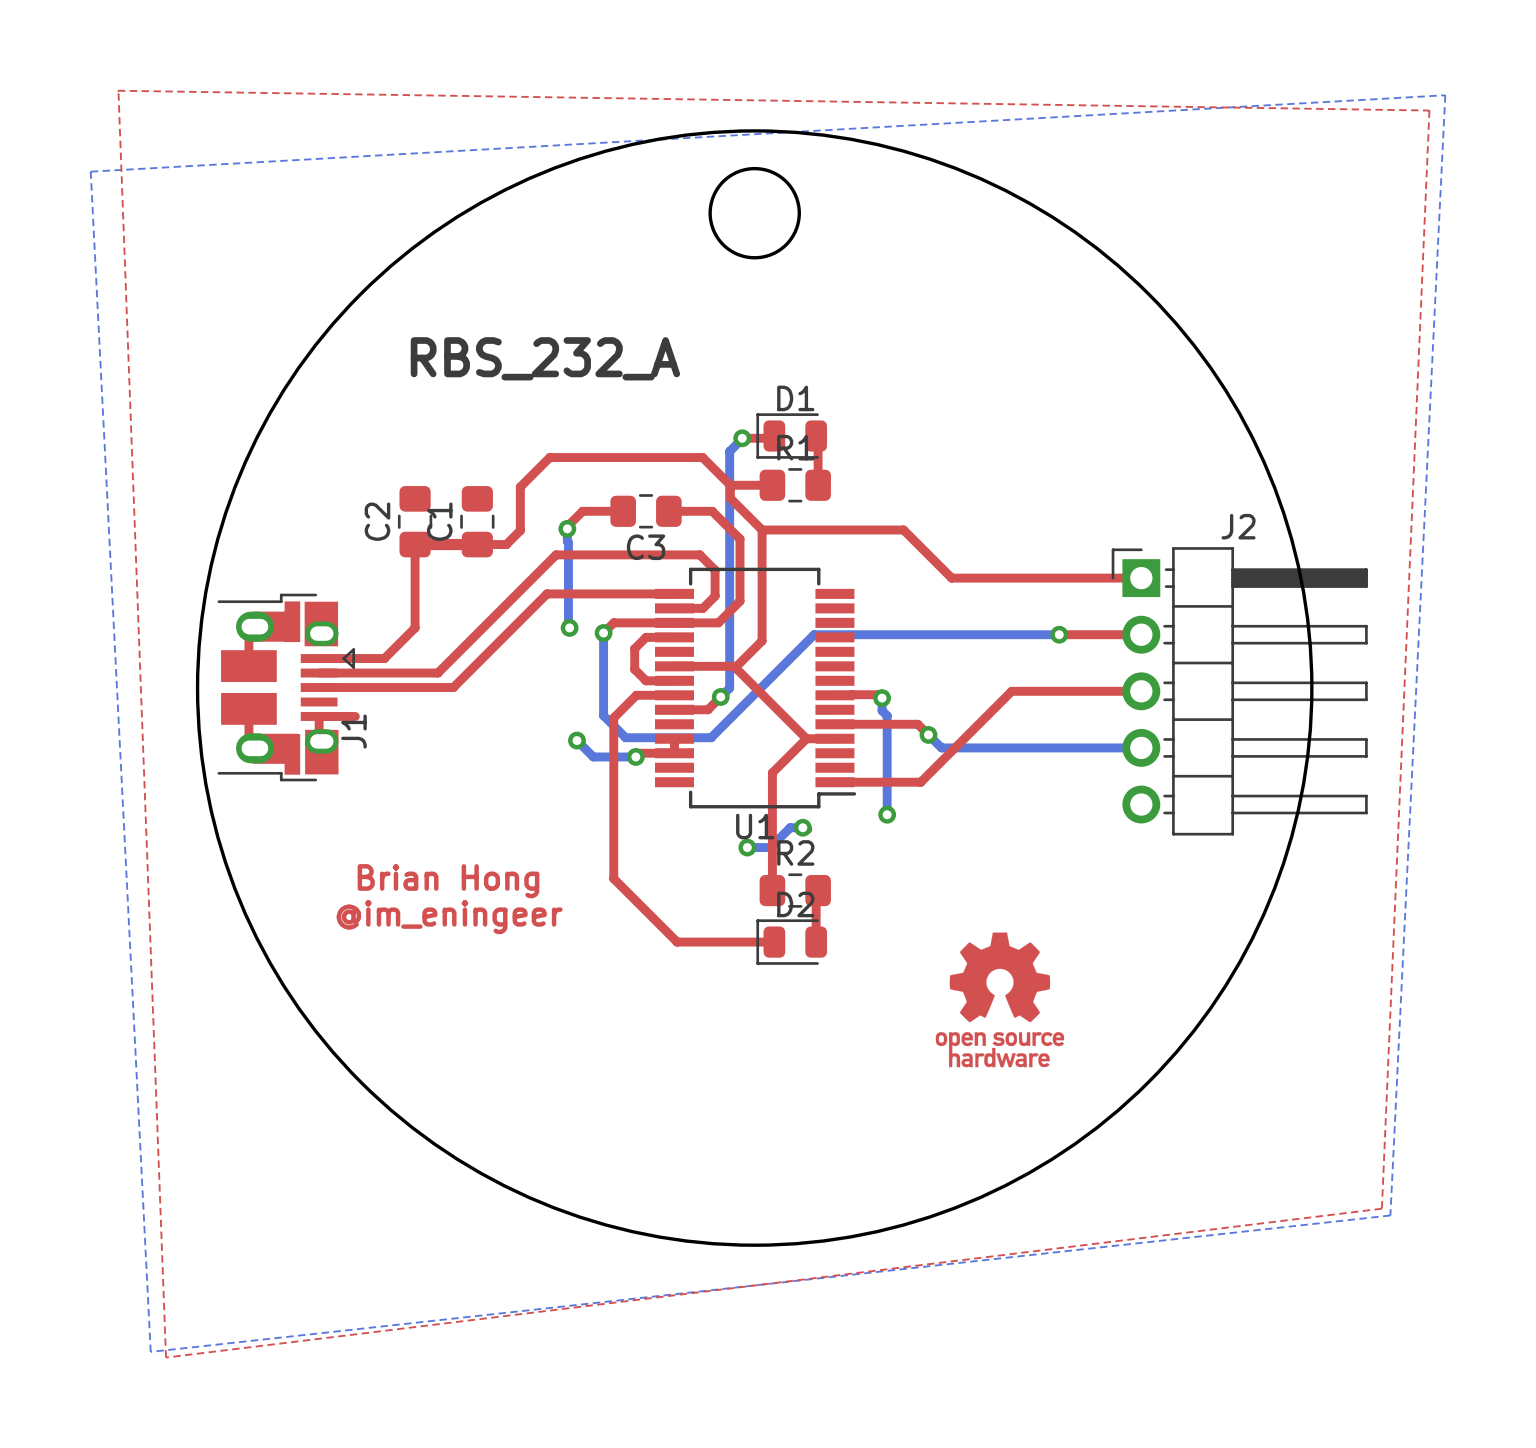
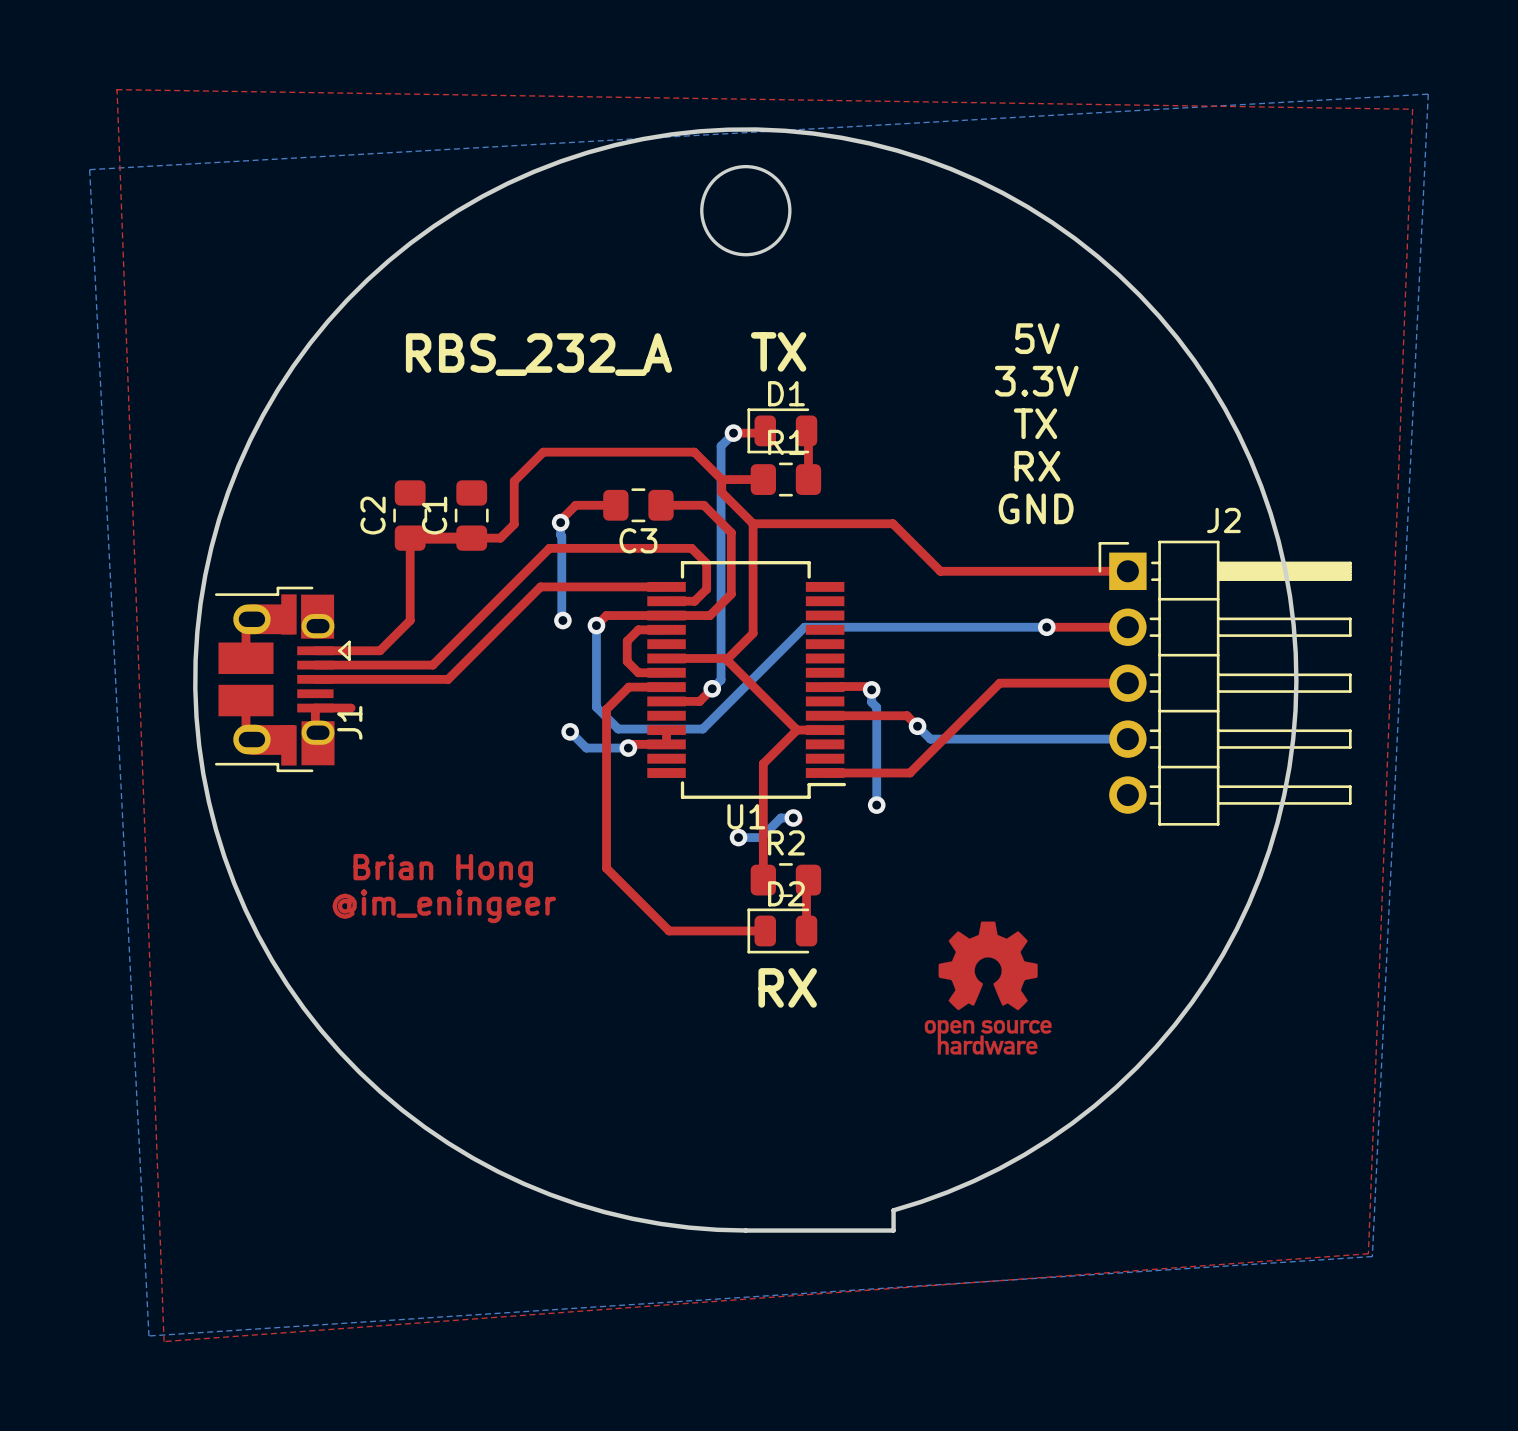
bottom zone outline: (1445, 95) (1390, 1215) (150, 1351) -> (1428, 94) (1372, 1256) (148, 1335)
top zone outline: (1429, 110) (1381, 1208) (166, 1357) -> (1412, 109) (1368, 1253) (164, 1341)
round board edge: [195, 129, 1314, 1247] -> none
text: none -> 5V (1037, 338)
text: none -> TX (778, 351)
text: none -> 3.3V (1036, 381)
text: none -> TX (1035, 423)
text: none -> RX (1037, 466)
text: none -> GND (1036, 508)
text: none -> RX (787, 987)
board edge: none -> (893, 1210) (893, 1230) (745, 1230) (688, 1227) (632, 1218) (577, 1204) (524, 1183) (473, 1158) (425, 1127) (380, 1091) (321, 1030) (287, 984) (258, 935) (234, 883) (215, 829) (203, 773) (196, 717) (195, 660) (200, 603) (219, 519) (238, 466) (263, 414) (293, 366) (328, 321) (367, 280) (410, 243) (482, 196) (533, 171) (587, 152) (643, 139) (699, 131) (756, 129) (813, 133) (897, 150) (951, 169) (1003, 193) (1052, 222) (1097, 256) (1139, 295) (1177, 337) (1210, 384) (1238, 434) (1270, 513) (1285, 568) (1293, 624) (1296, 681) (1293, 738) (1284, 795) (1269, 850) (1248, 903) (1223, 954) (1192, 1002) (1156, 1046) (1116, 1087) (1072, 1123) (999, 1168) (947, 1192) (893, 1210)

